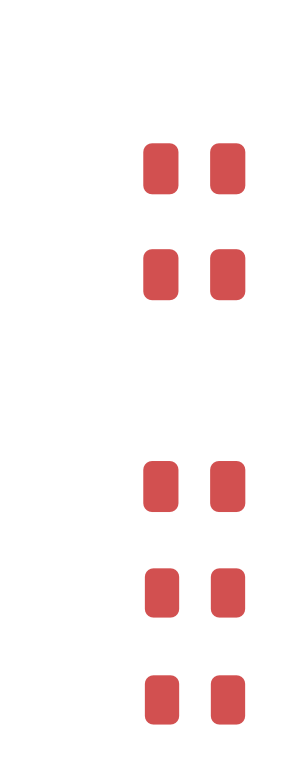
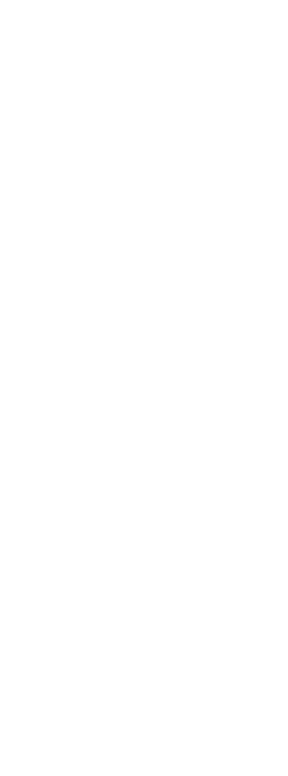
part: (194, 168) -> none
part: (194, 274) -> none
part: (194, 486) -> none
part: (195, 592) -> none
part: (195, 699) -> none

